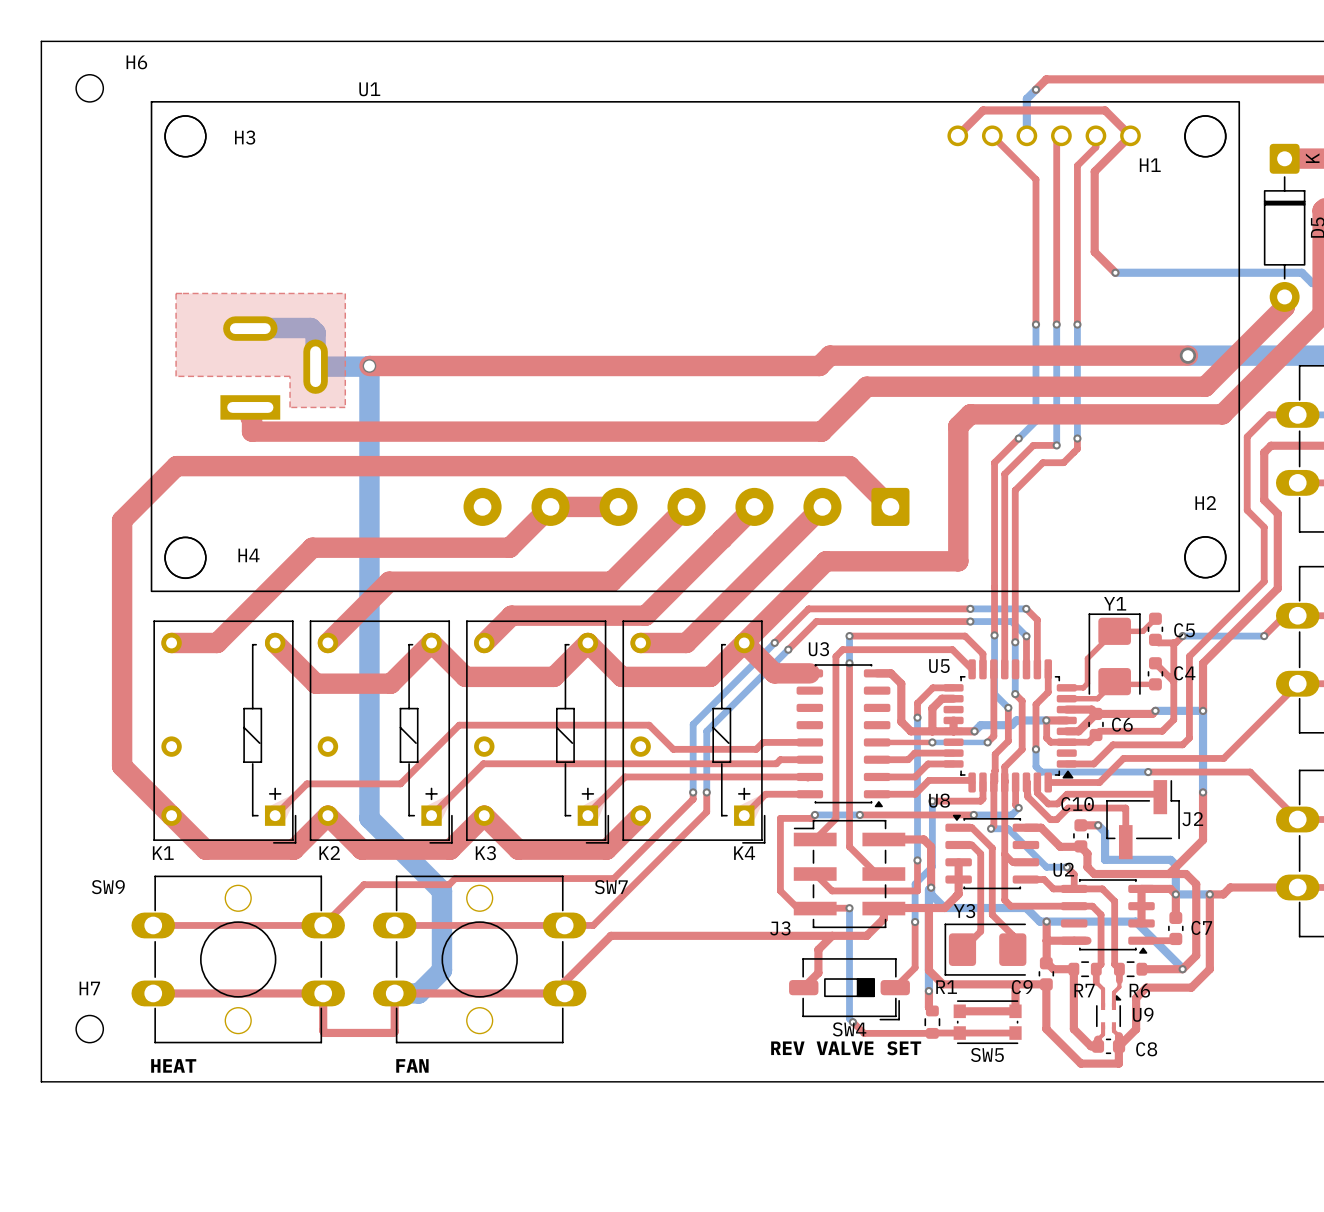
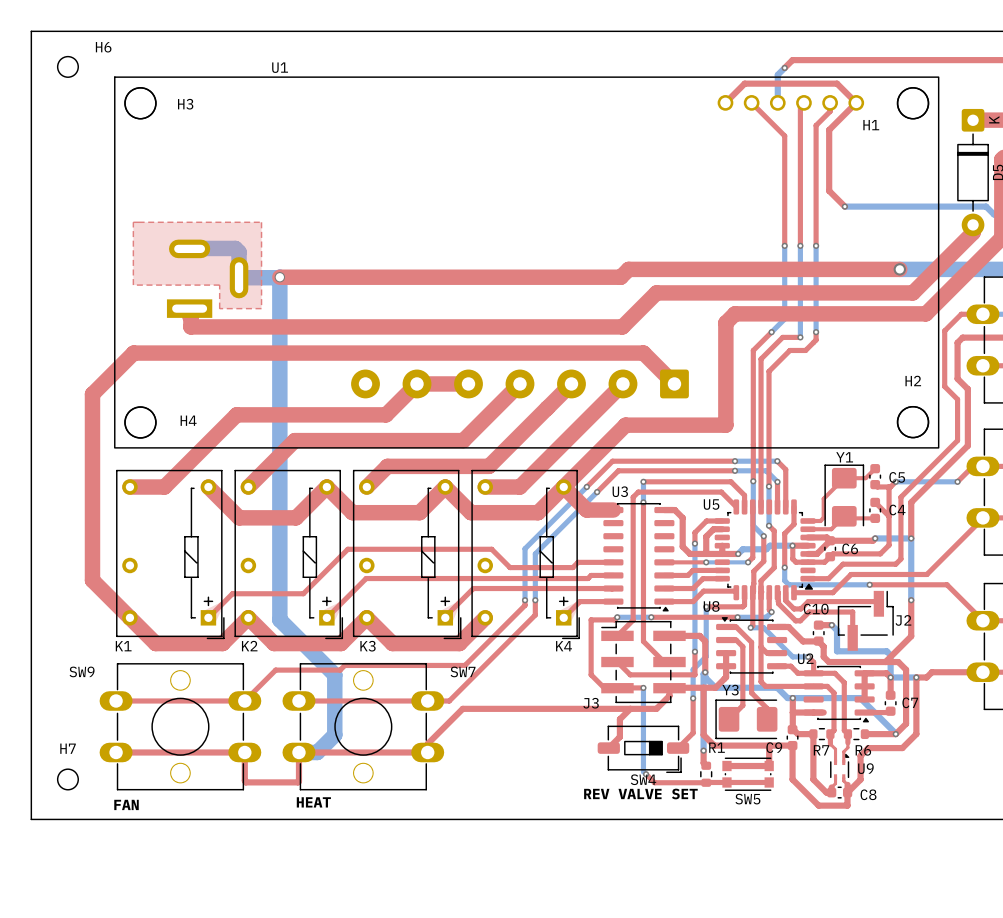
text: HEAT (173, 1065) -> FAN (126, 804)
text: FAN (412, 1065) -> HEAT (313, 802)

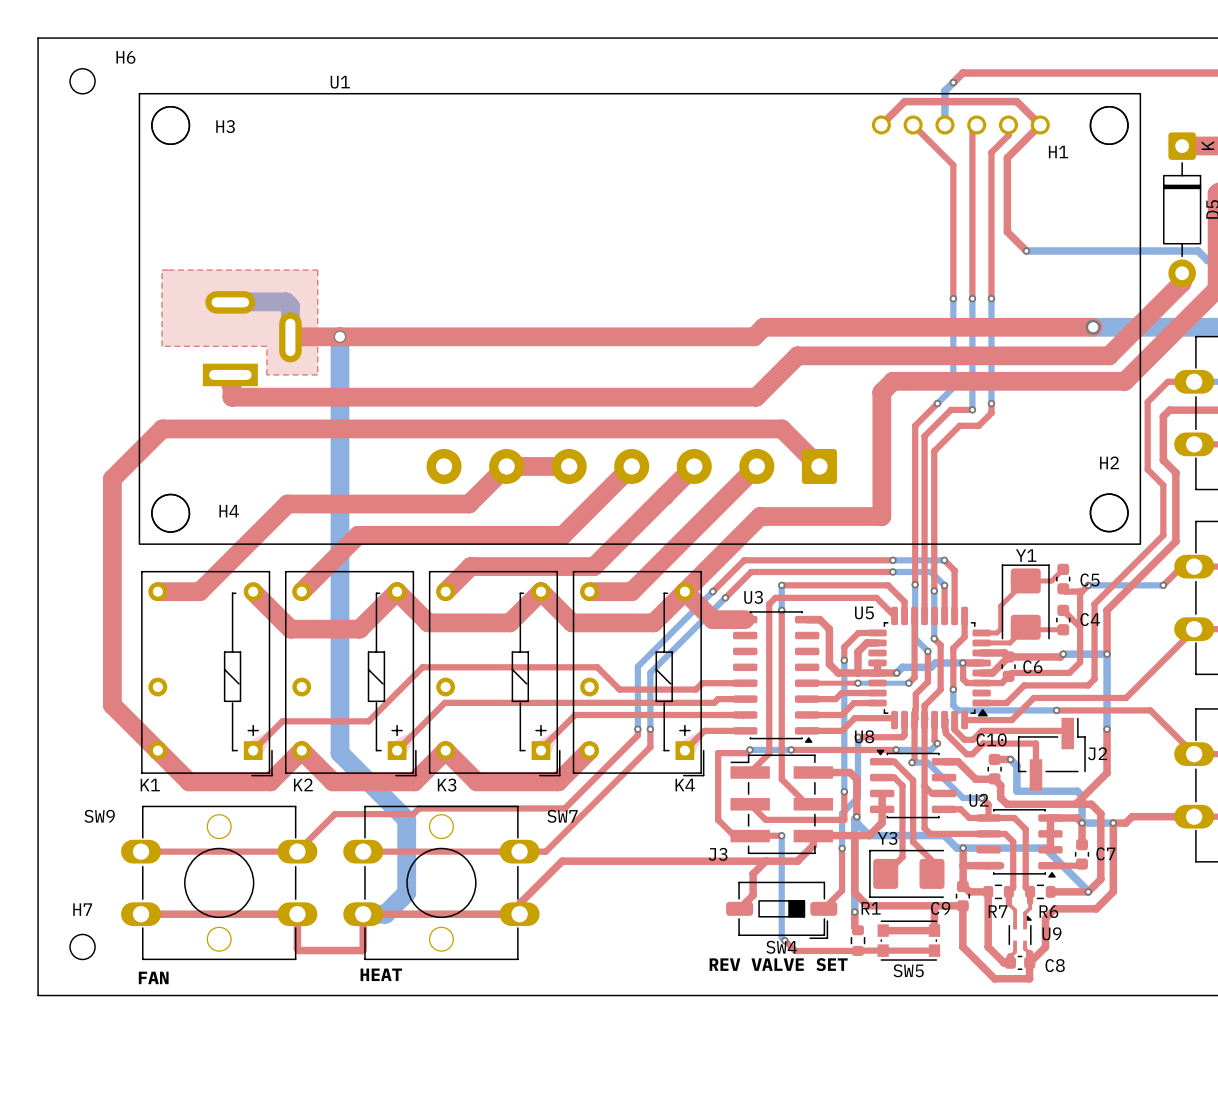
bottom track: (239, 277) (279, 277) -> none
top track: none -> (339, 336) (290, 337)

